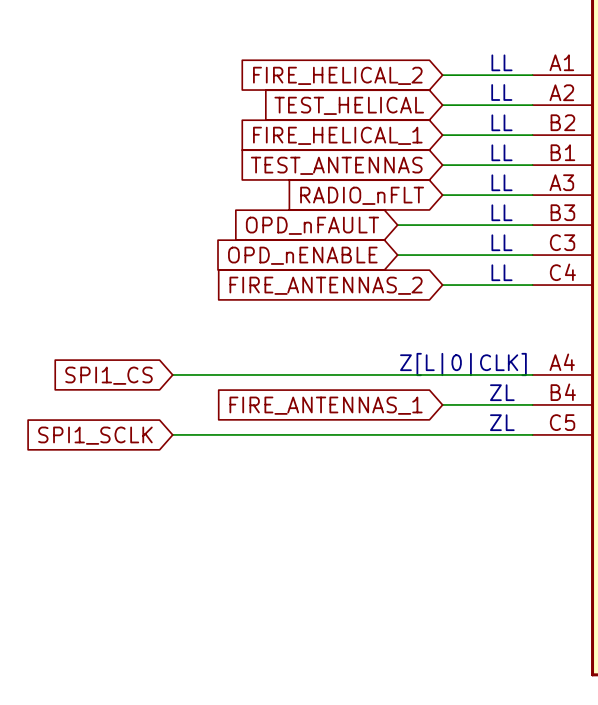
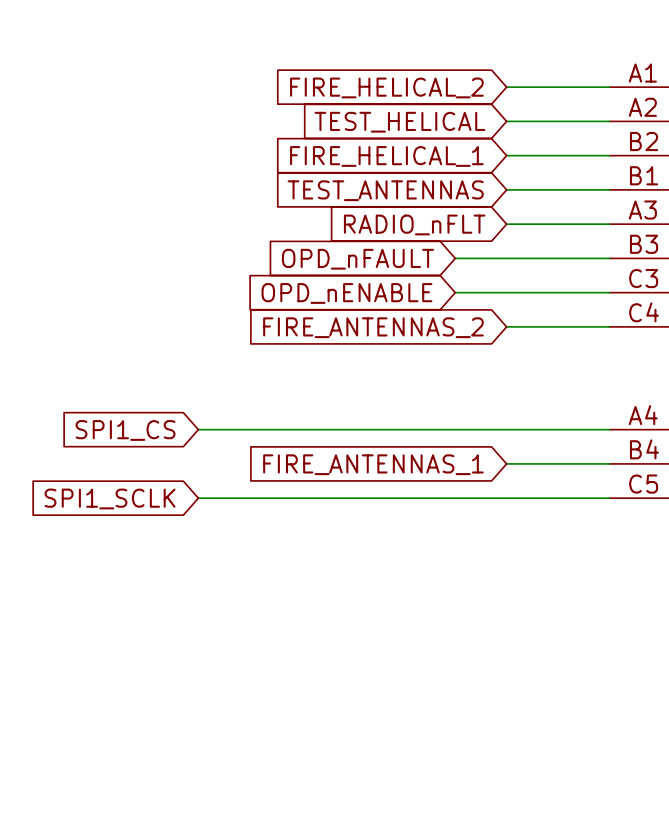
text: LL (501, 62) -> none
text: LL (501, 92) -> none
text: LL (501, 122) -> none
text: LL (501, 152) -> none
text: LL (501, 182) -> none
text: LL (501, 212) -> none
text: LL (501, 242) -> none
text: LL (501, 272) -> none
text: Z[L|0|CLK] (463, 364) -> none
text: ZL (502, 392) -> none
text: ZL (502, 422) -> none

